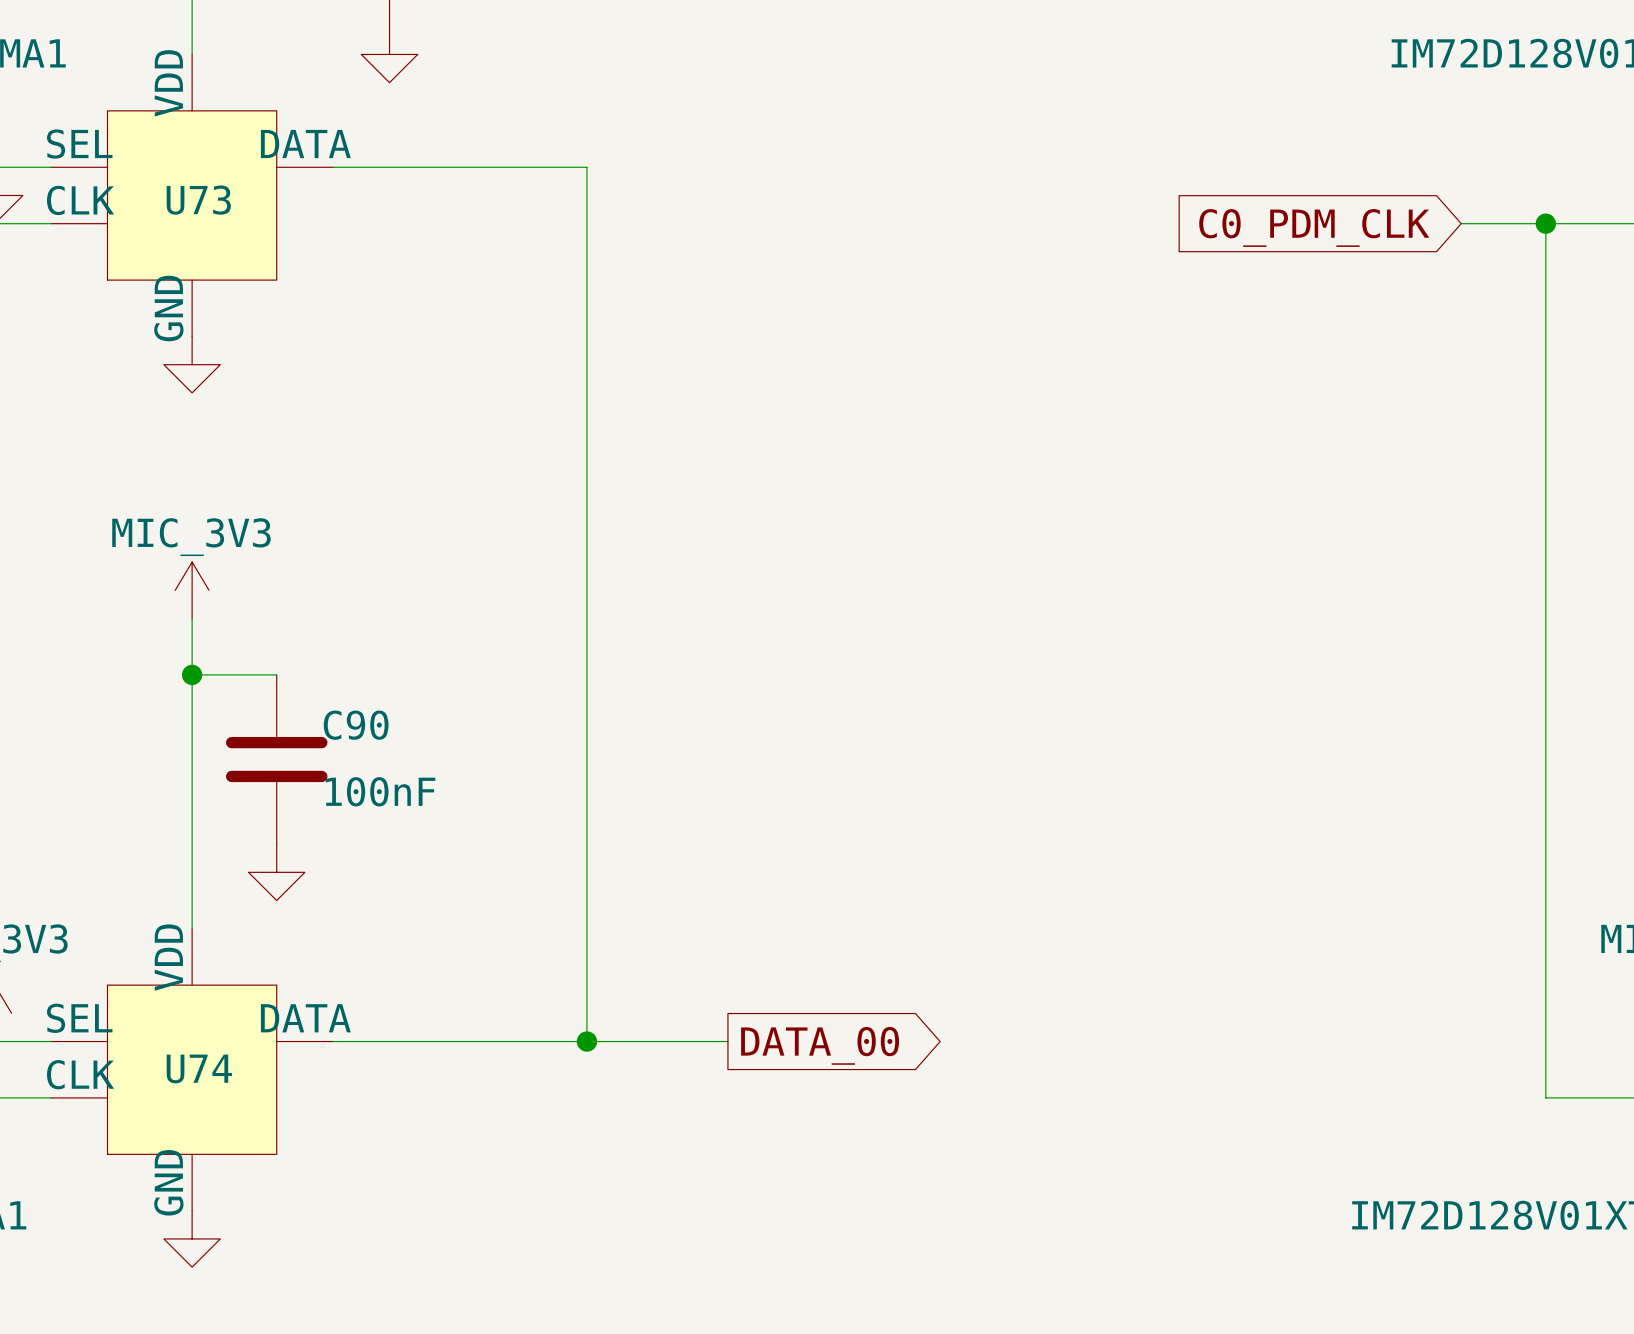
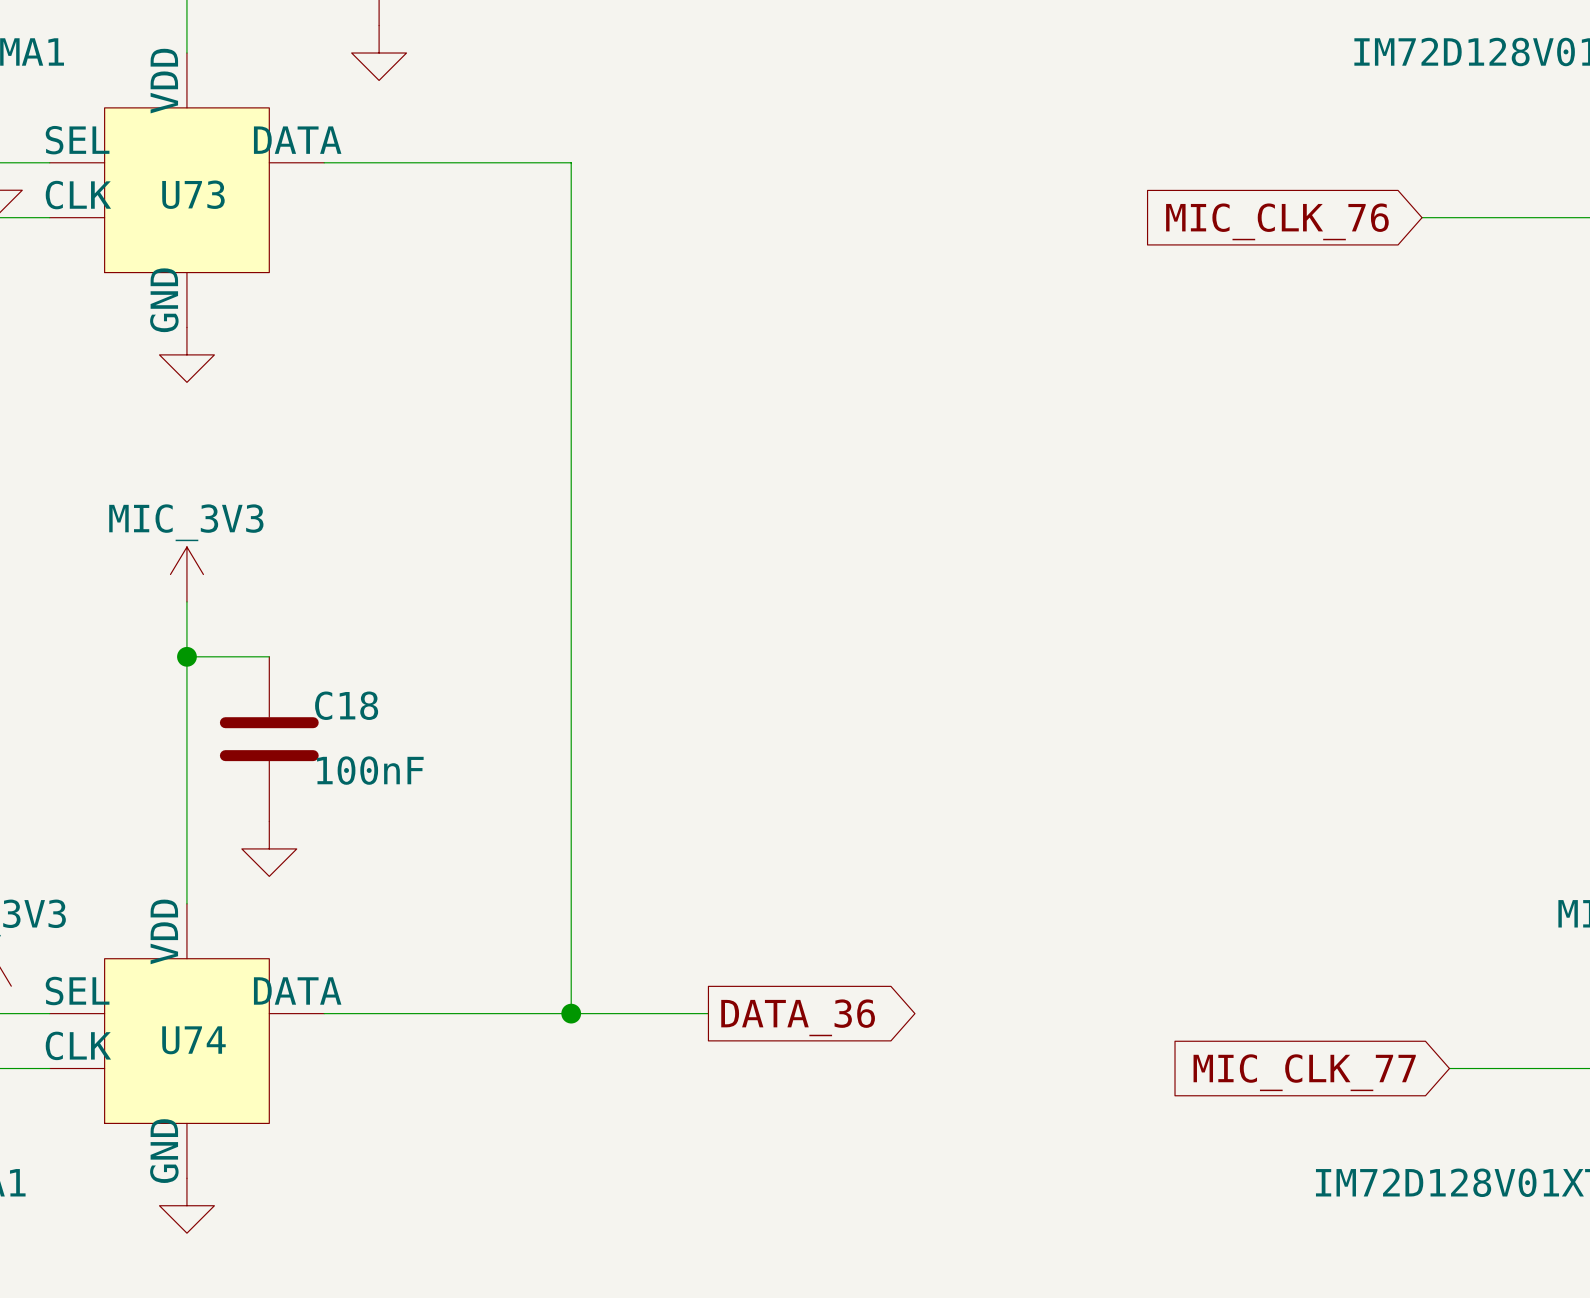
wire: (1545, 223) (1545, 1097) -> (1449, 1068) (1504, 1068)
junction: (1545, 223) -> none
global label: C0_PDM_CLK (1314, 227) -> MIC_CLK_76 (1277, 221)
C90 name: C90 (356, 725) -> C18 (346, 705)
global label: DATA_00 (820, 1045) -> DATA_36 (798, 1017)
global label: none -> MIC_CLK_77 (1304, 1072)

